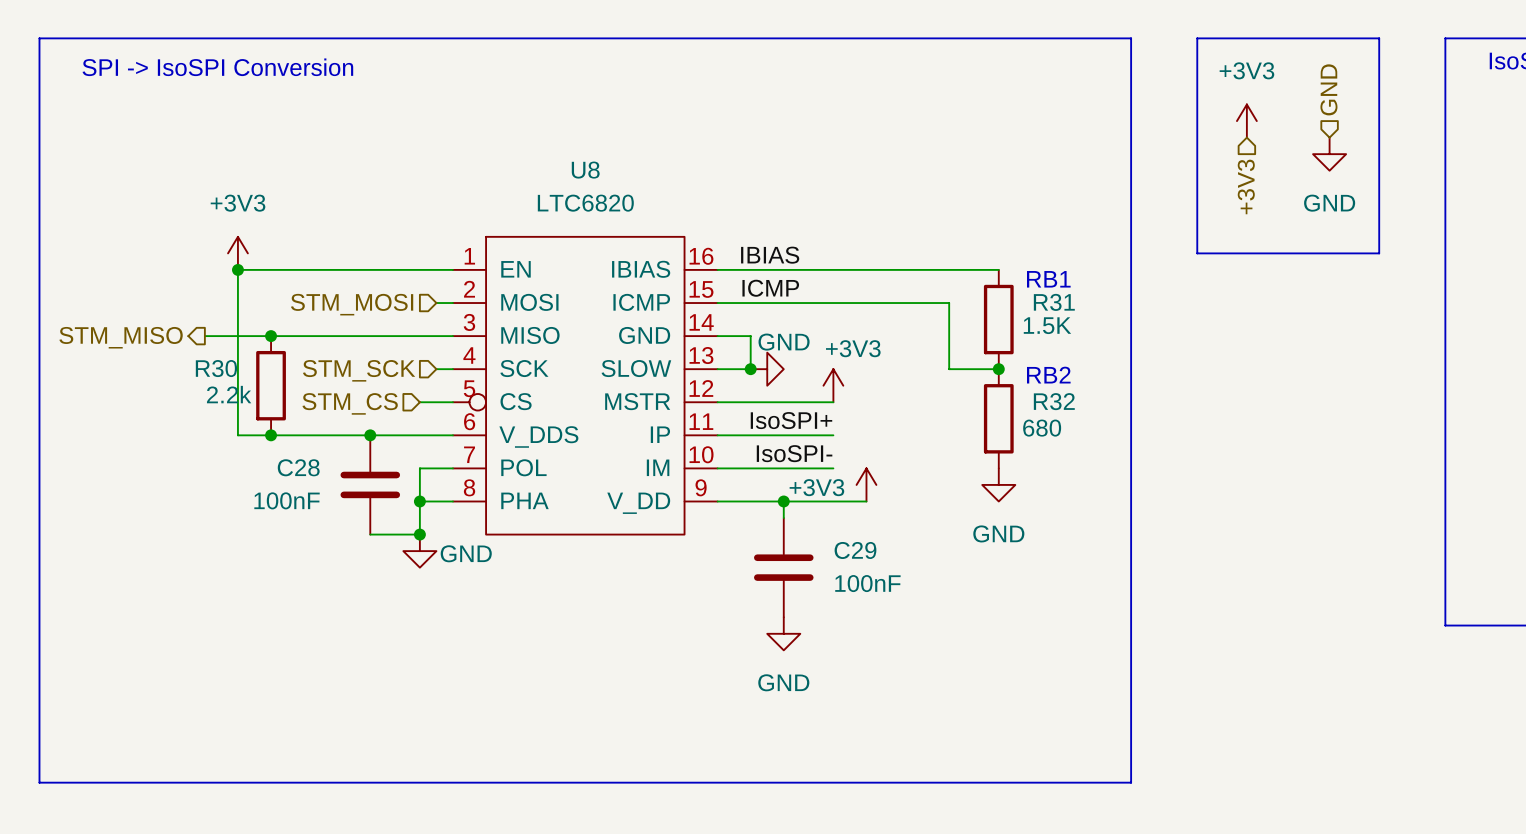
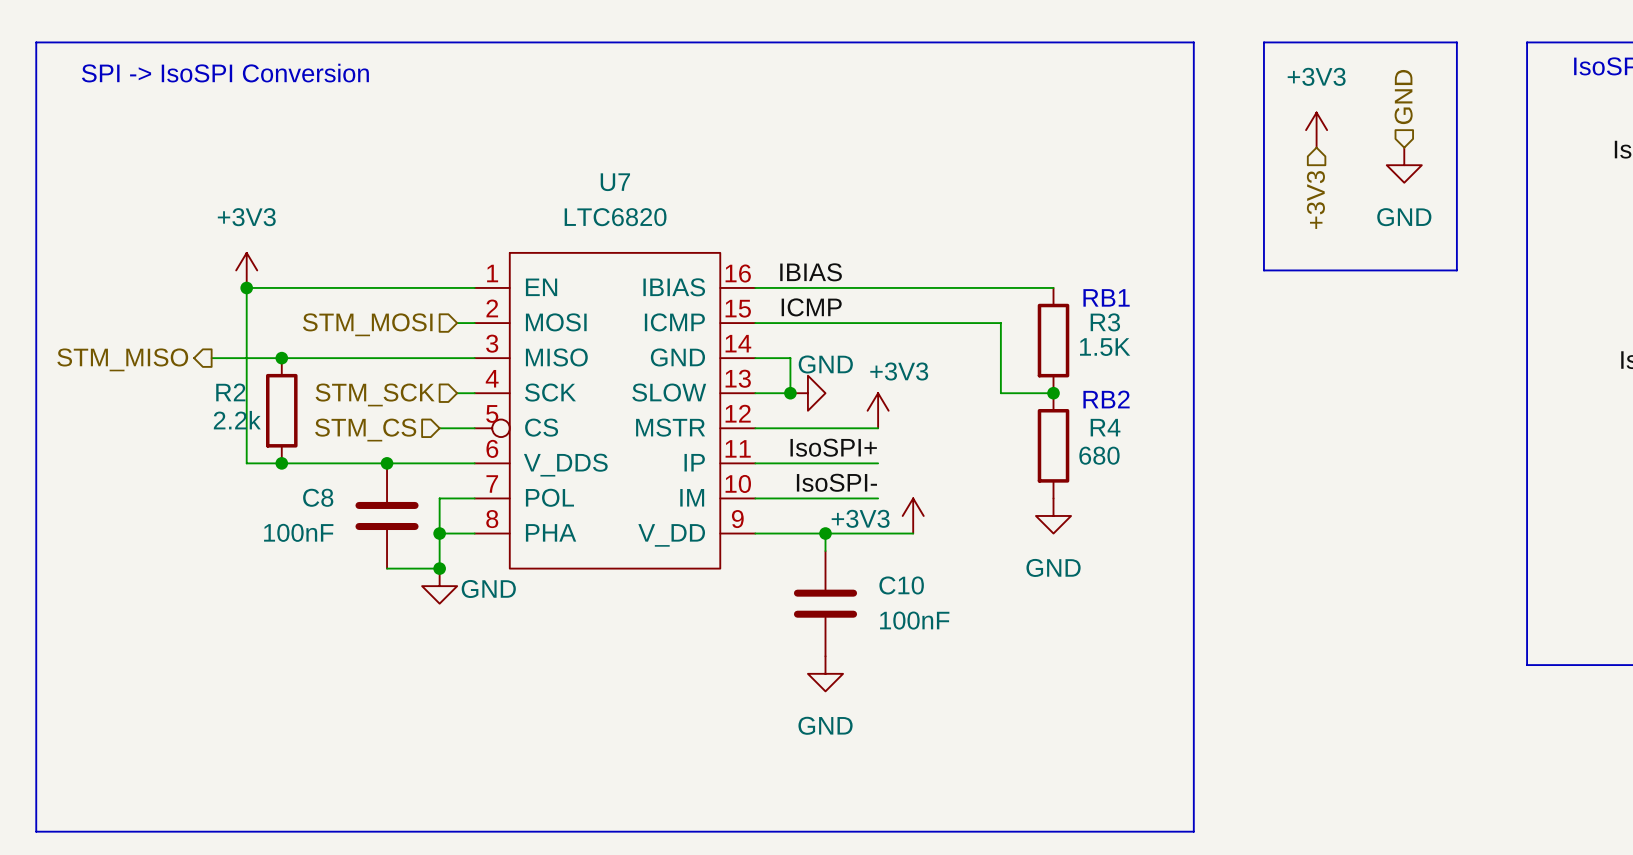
U8 name: U8 (585, 170) -> U7 (615, 182)
R31 name: R31 (1054, 302) -> R3 (1105, 322)
R30 name: R30 (216, 368) -> R2 (230, 392)
R32 name: R32 (1054, 401) -> R4 (1105, 427)
C28 name: C28 (298, 467) -> C8 (318, 497)
C29 name: C29 (855, 550) -> C10 (901, 585)

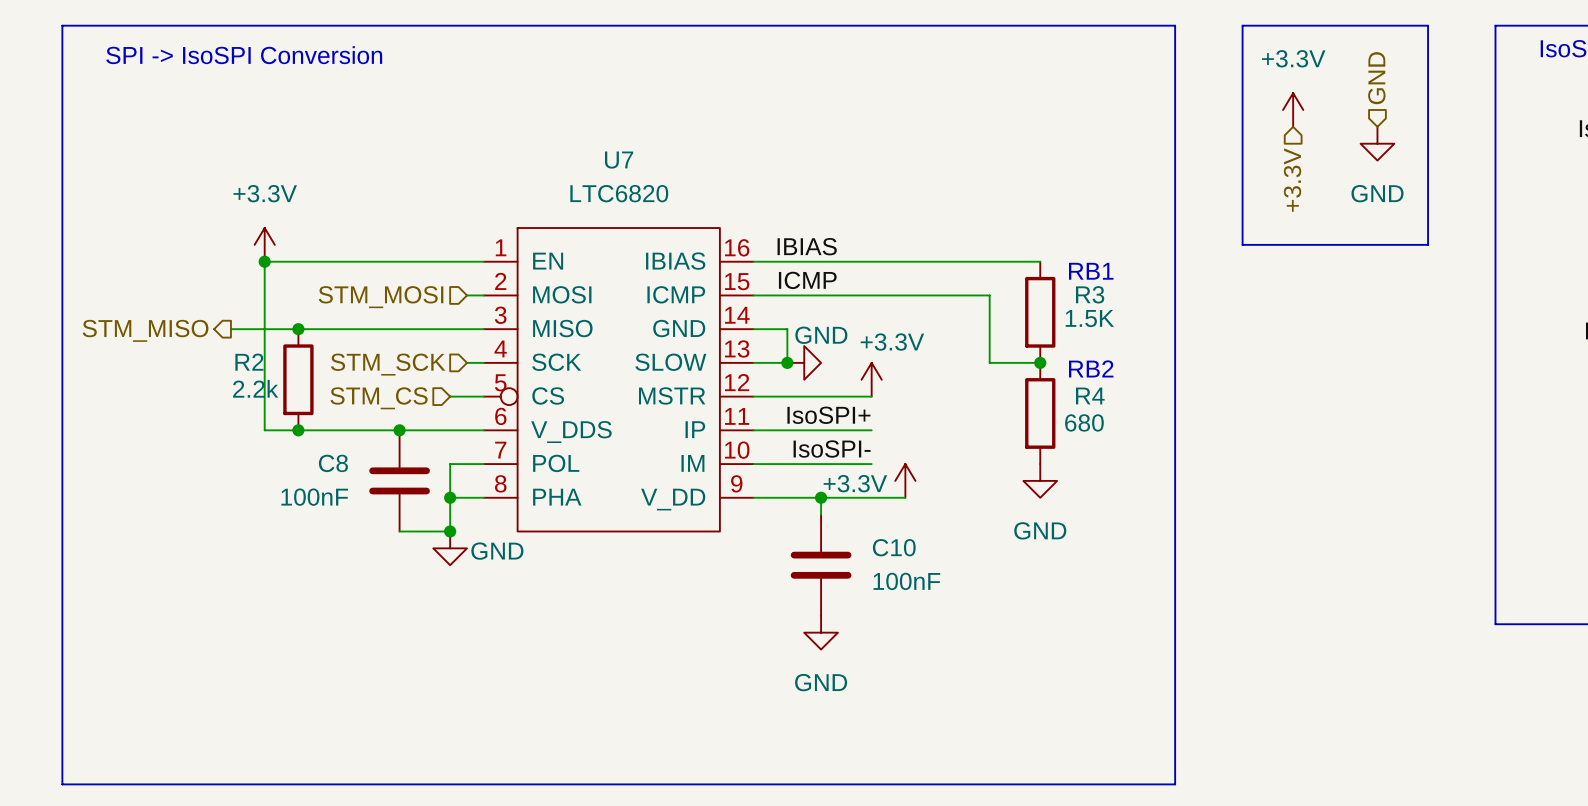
power symbol: +3V3 (1316, 130) -> +3.3V (1293, 109)
hierarchical label: +3V3 (1315, 200) -> +3.3V (1292, 180)
power symbol: +3V3 (246, 270) -> +3.3V (264, 244)
power symbol: +3V3 (878, 410) -> +3.3V (871, 379)
power symbol: +3V3 (913, 515) -> +3.3V (905, 480)

